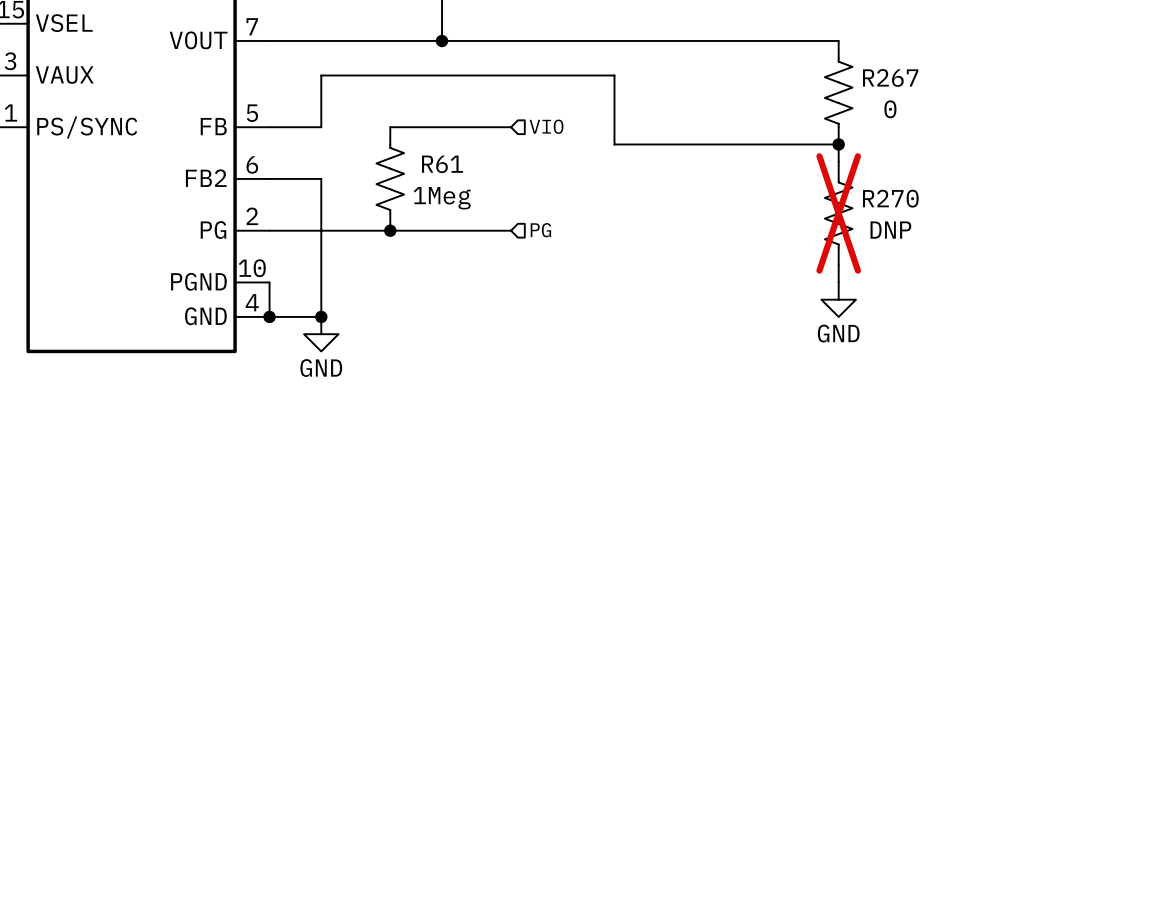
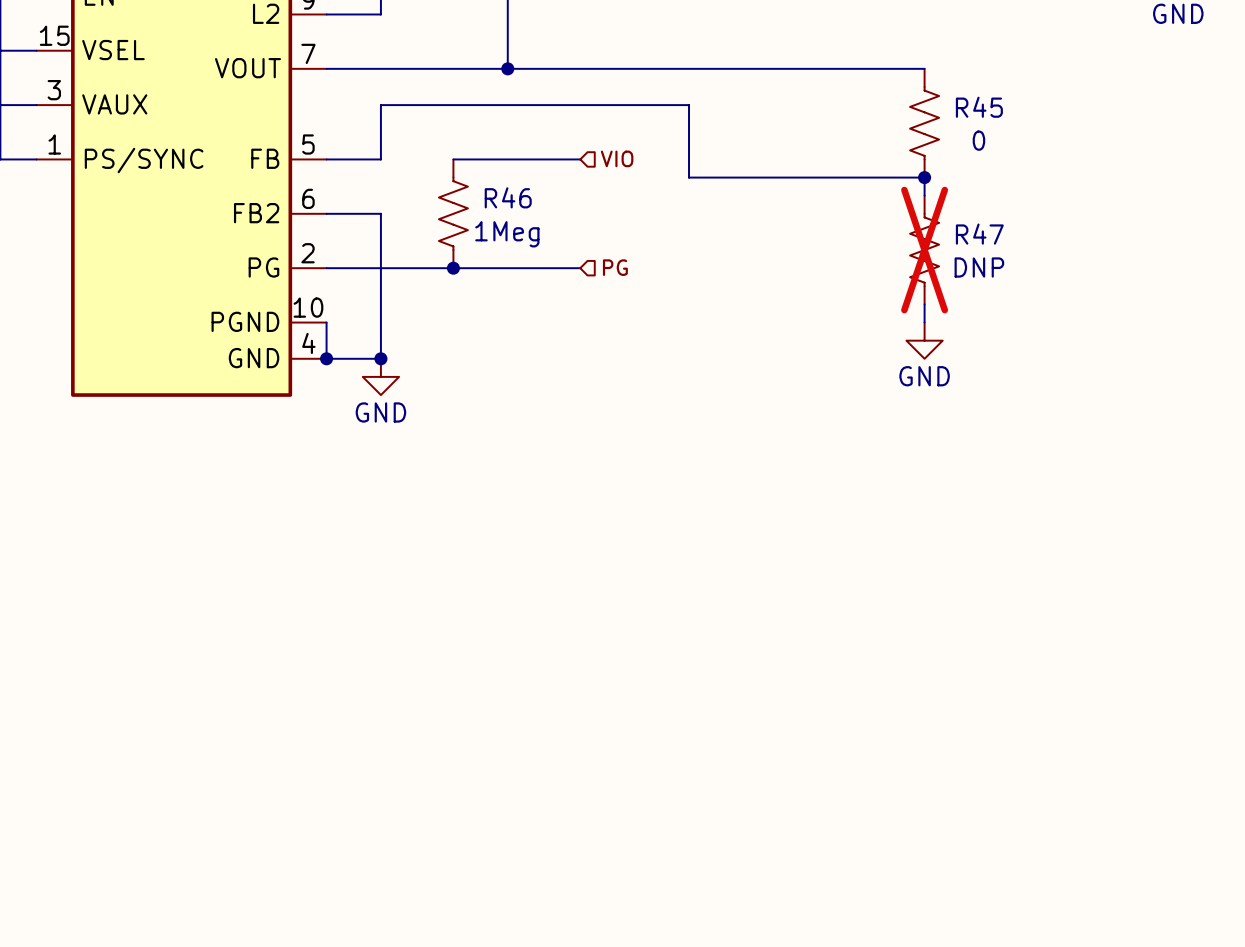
R267 name: R267 (890, 77) -> R45 (979, 107)
R61 name: R61 (442, 164) -> R46 (508, 197)
R270 name: R270 (890, 198) -> R47 (979, 234)

